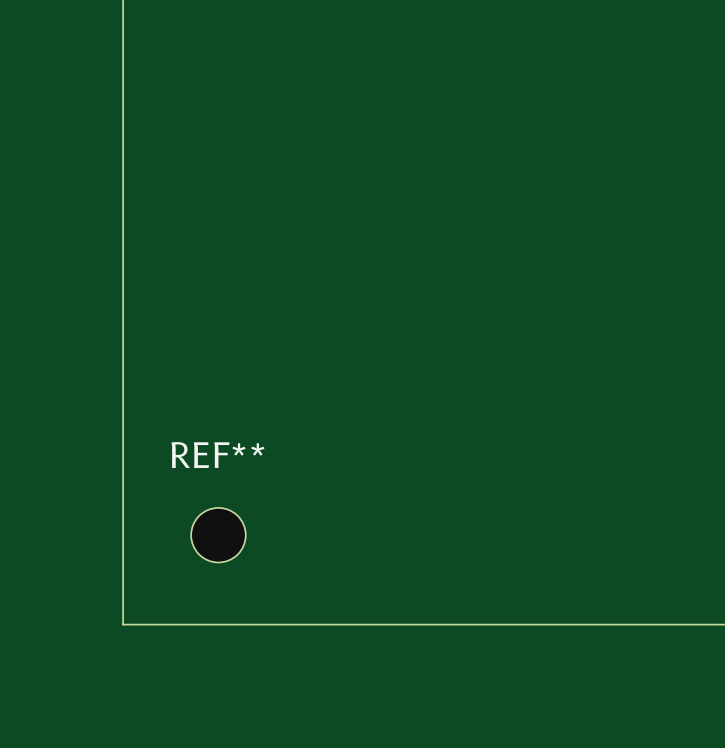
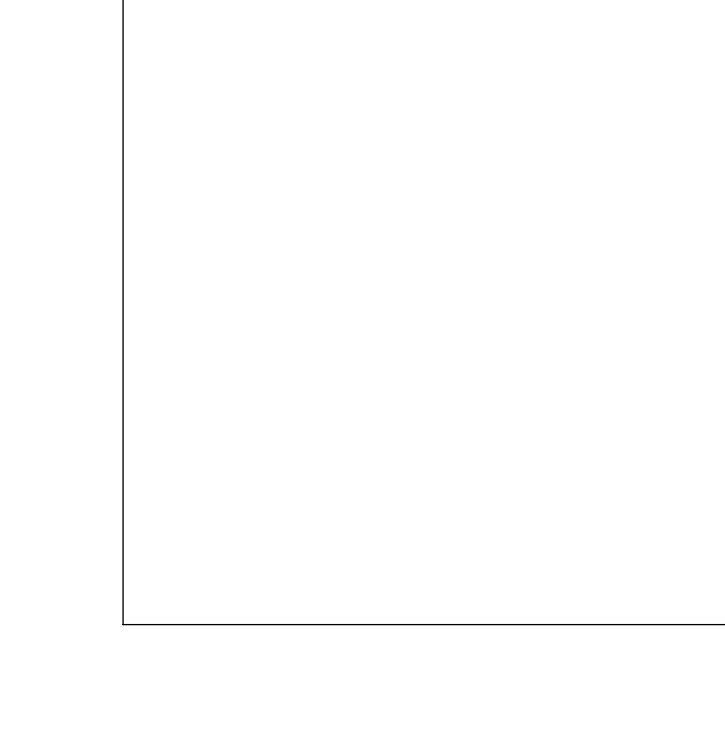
REF**: (218, 535) -> none

